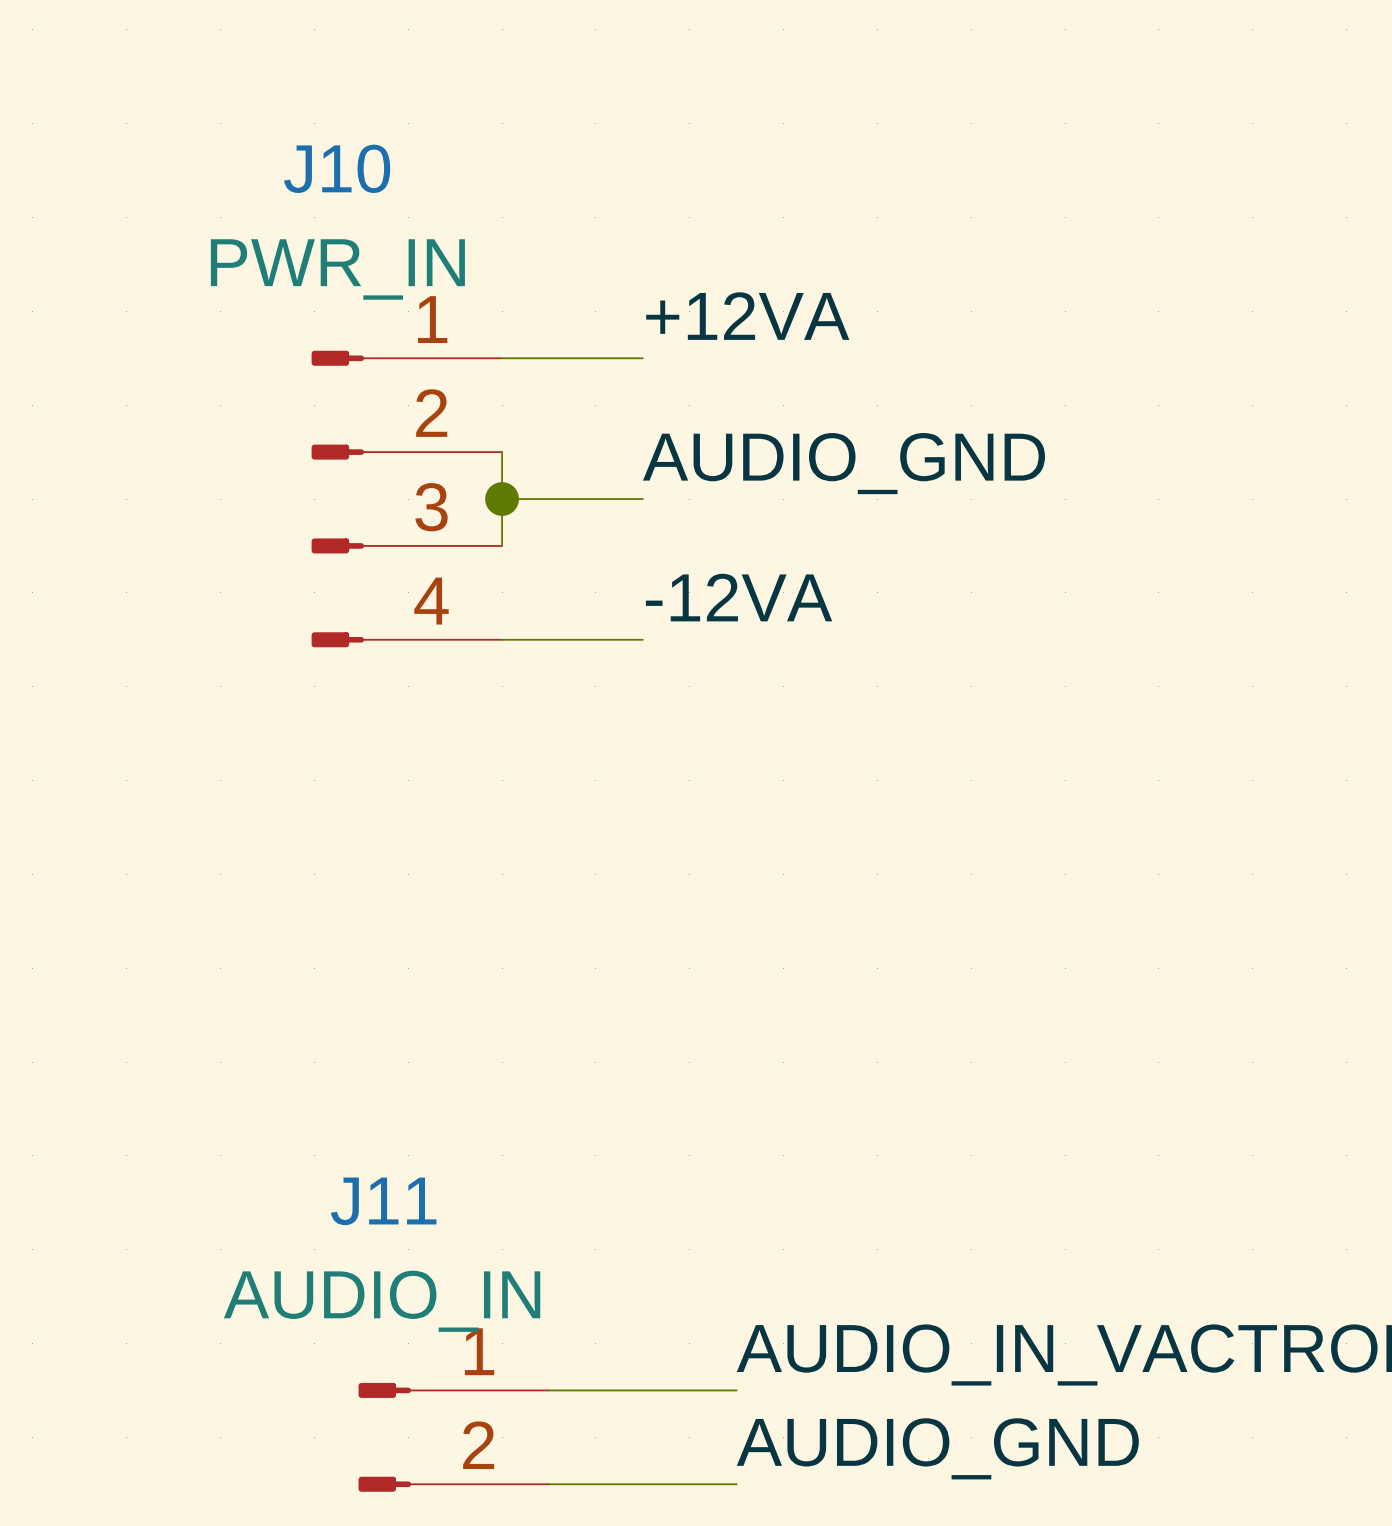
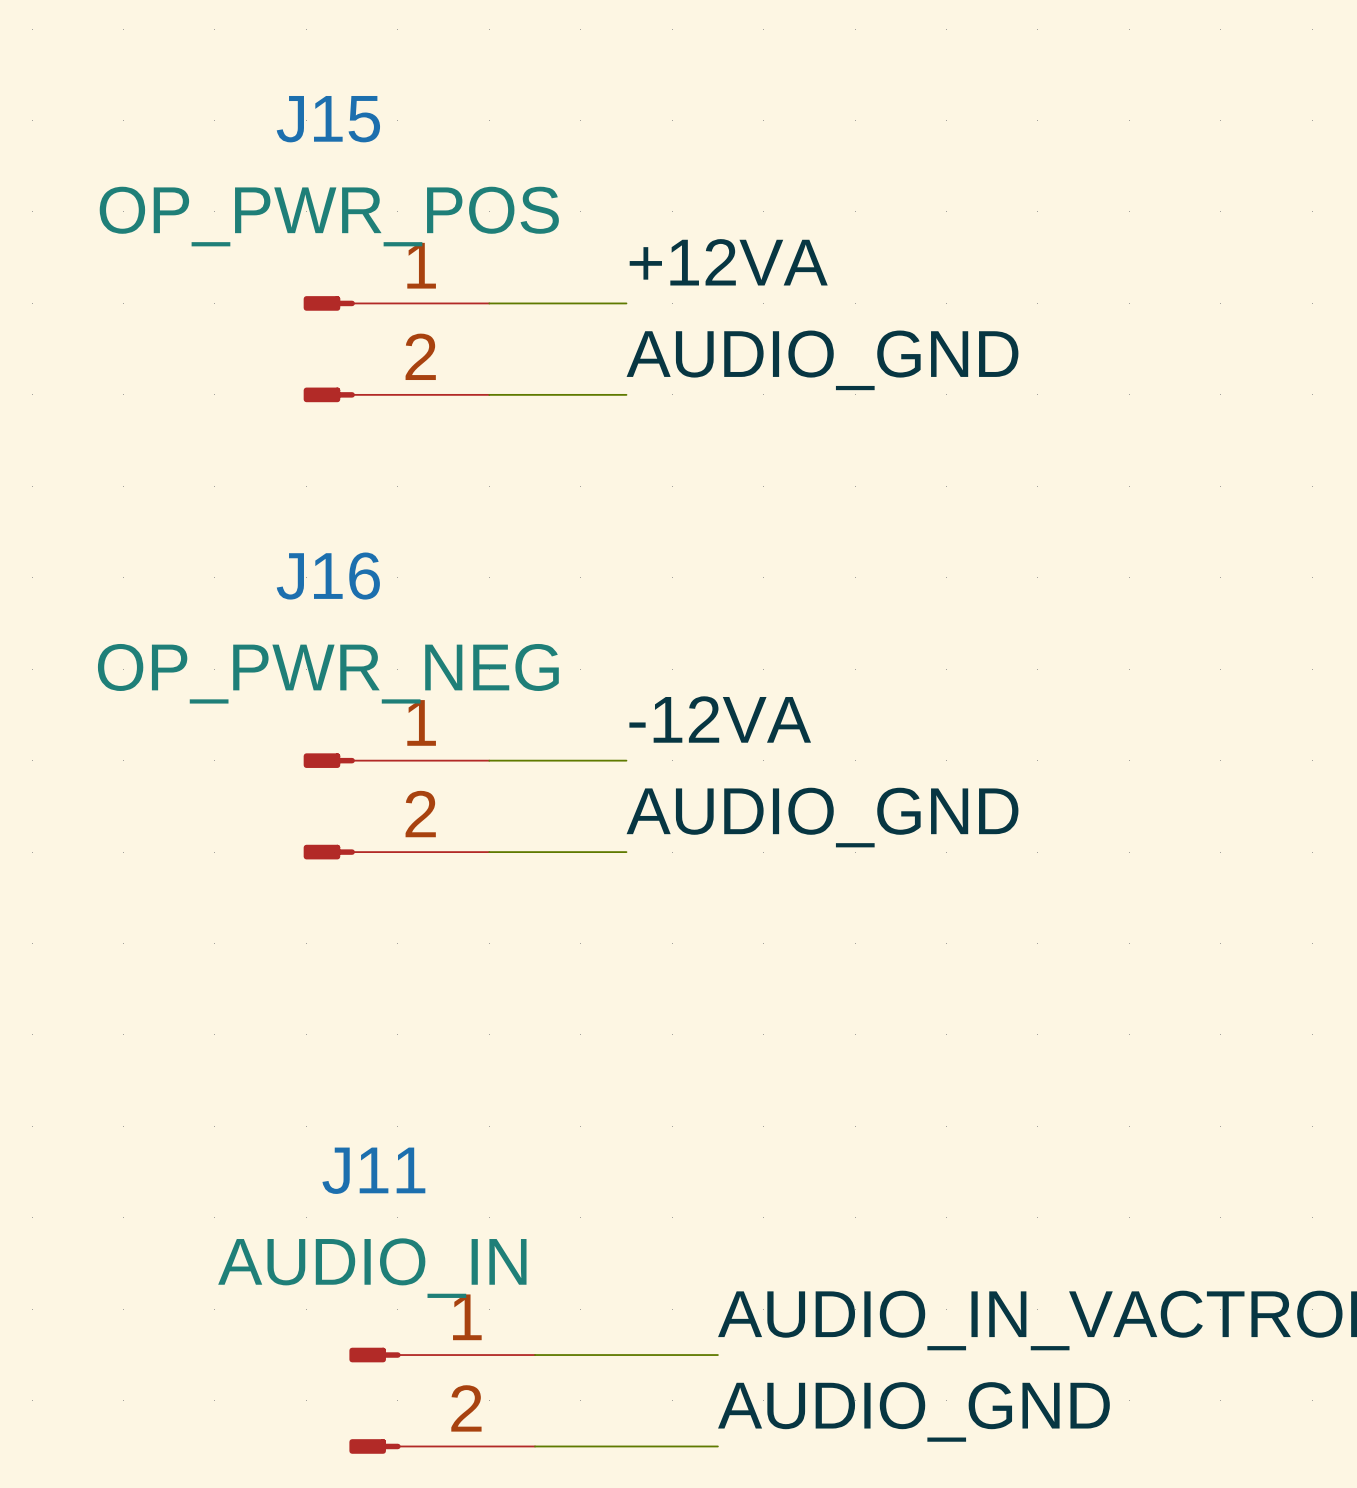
label position: +12VA (747, 316) -> +12VA (728, 262)
J15: none -> OP_PWR_POS (396, 349)
wire: (502, 358) (642, 358) -> (489, 394) (626, 394)
wire: (502, 452) (502, 545) -> none
label position: AUDIO_GND (843, 463) -> AUDIO_GND (822, 360)
J10: PWR_IN (406, 499) -> none
wire: (502, 499) (642, 499) -> (489, 303) (626, 303)
junction: (502, 499) -> none
label position: -12VA (739, 597) -> -12VA (720, 719)
wire: (502, 639) (642, 639) -> (489, 760) (626, 760)
J16: none -> OP_PWR_NEG (396, 806)
label: none -> AUDIO_GND (822, 817)
wire: none -> (489, 852) (626, 852)

